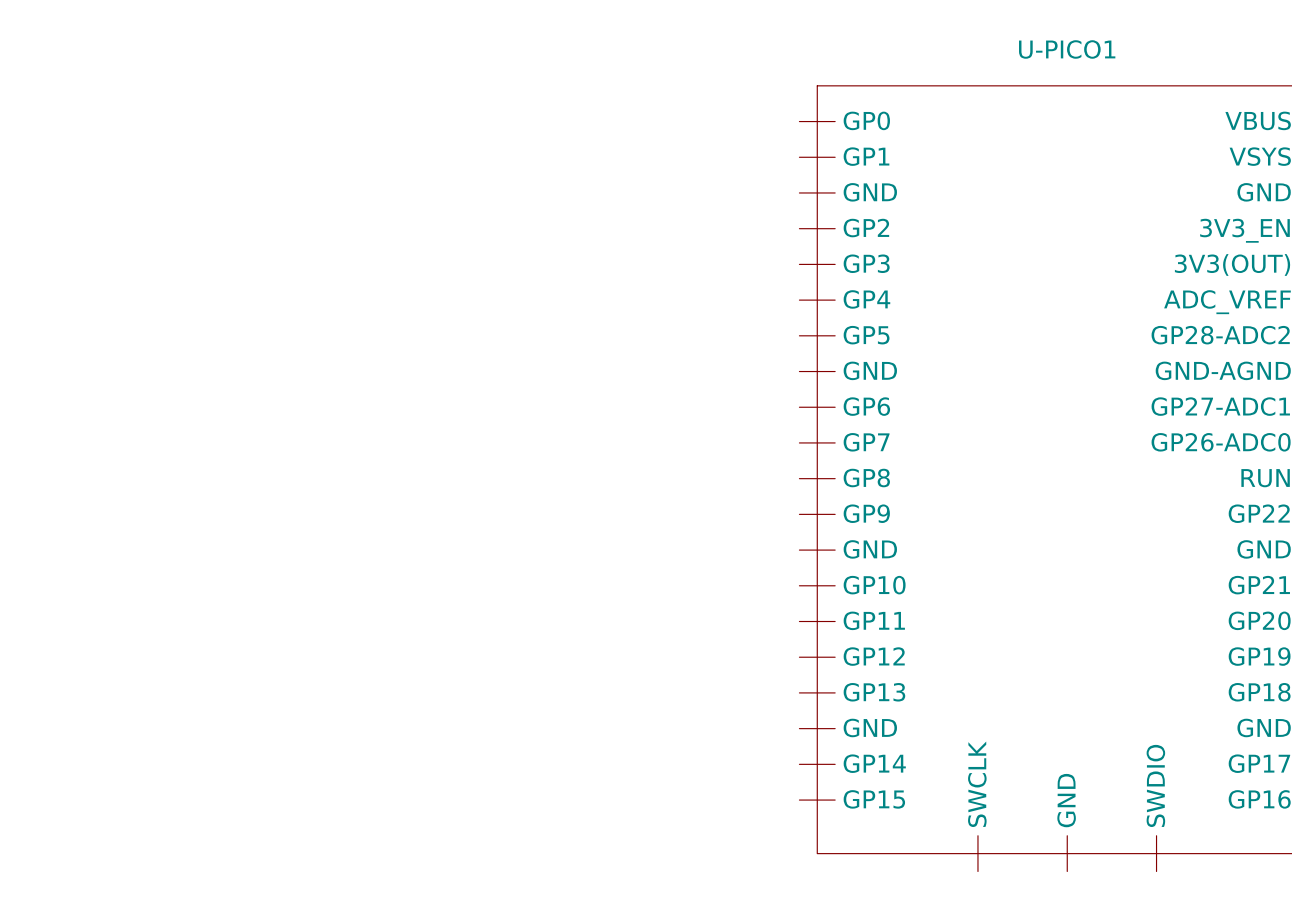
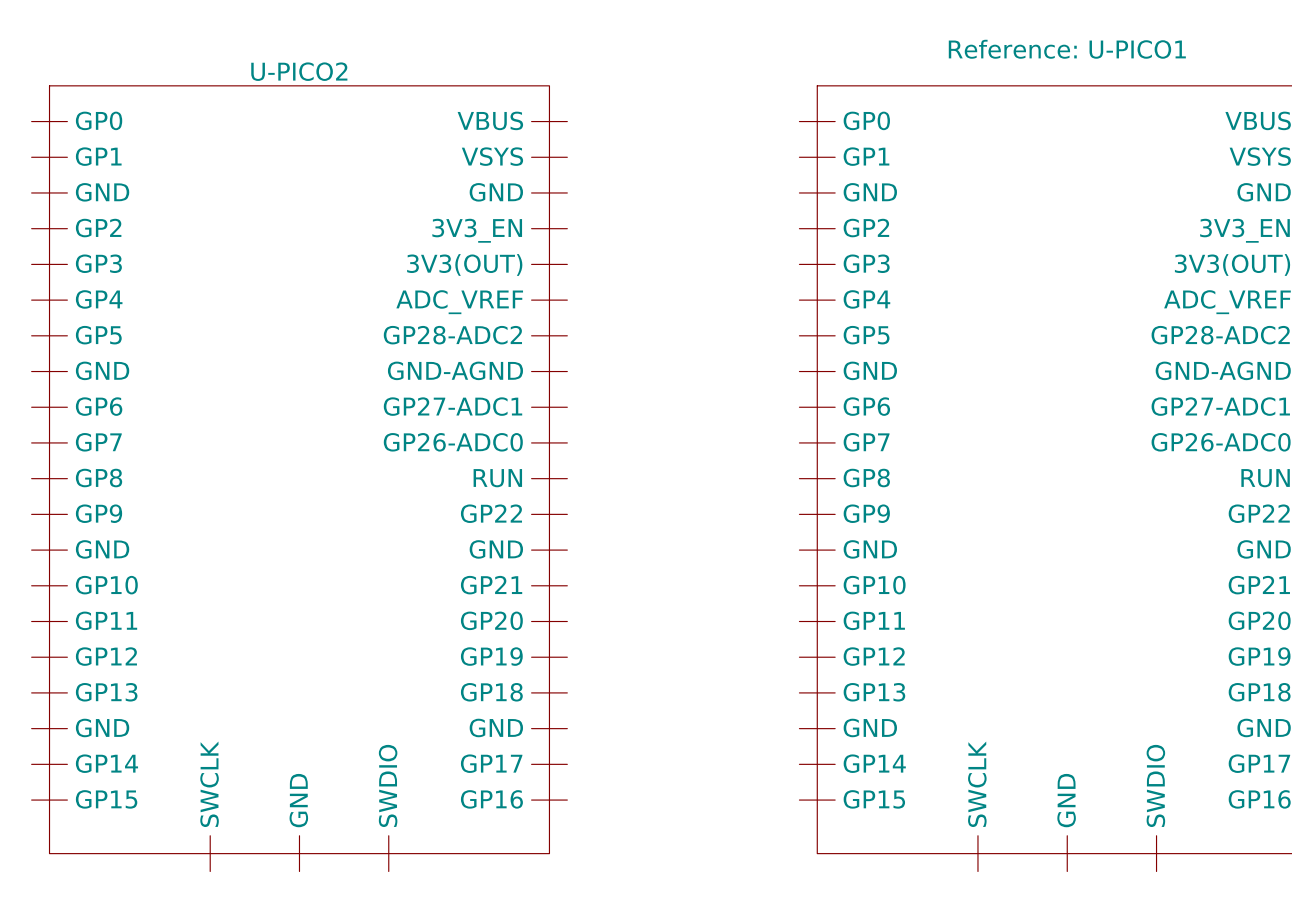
U-PICO1 name: U-PICO1 (1067, 49) -> Reference: U-PICO1 (1067, 49)
U-PICO2: none -> (299, 478)

